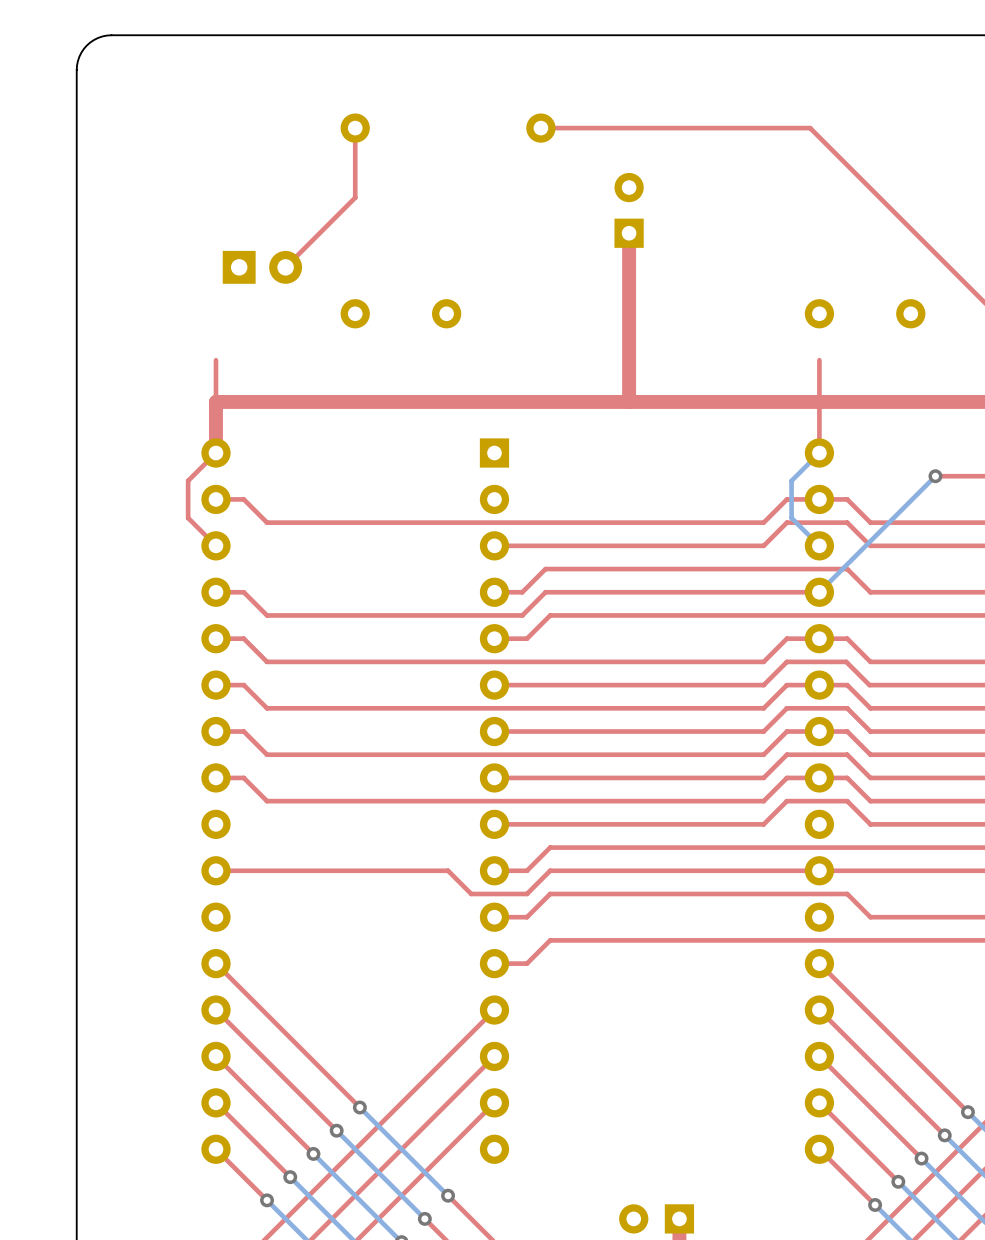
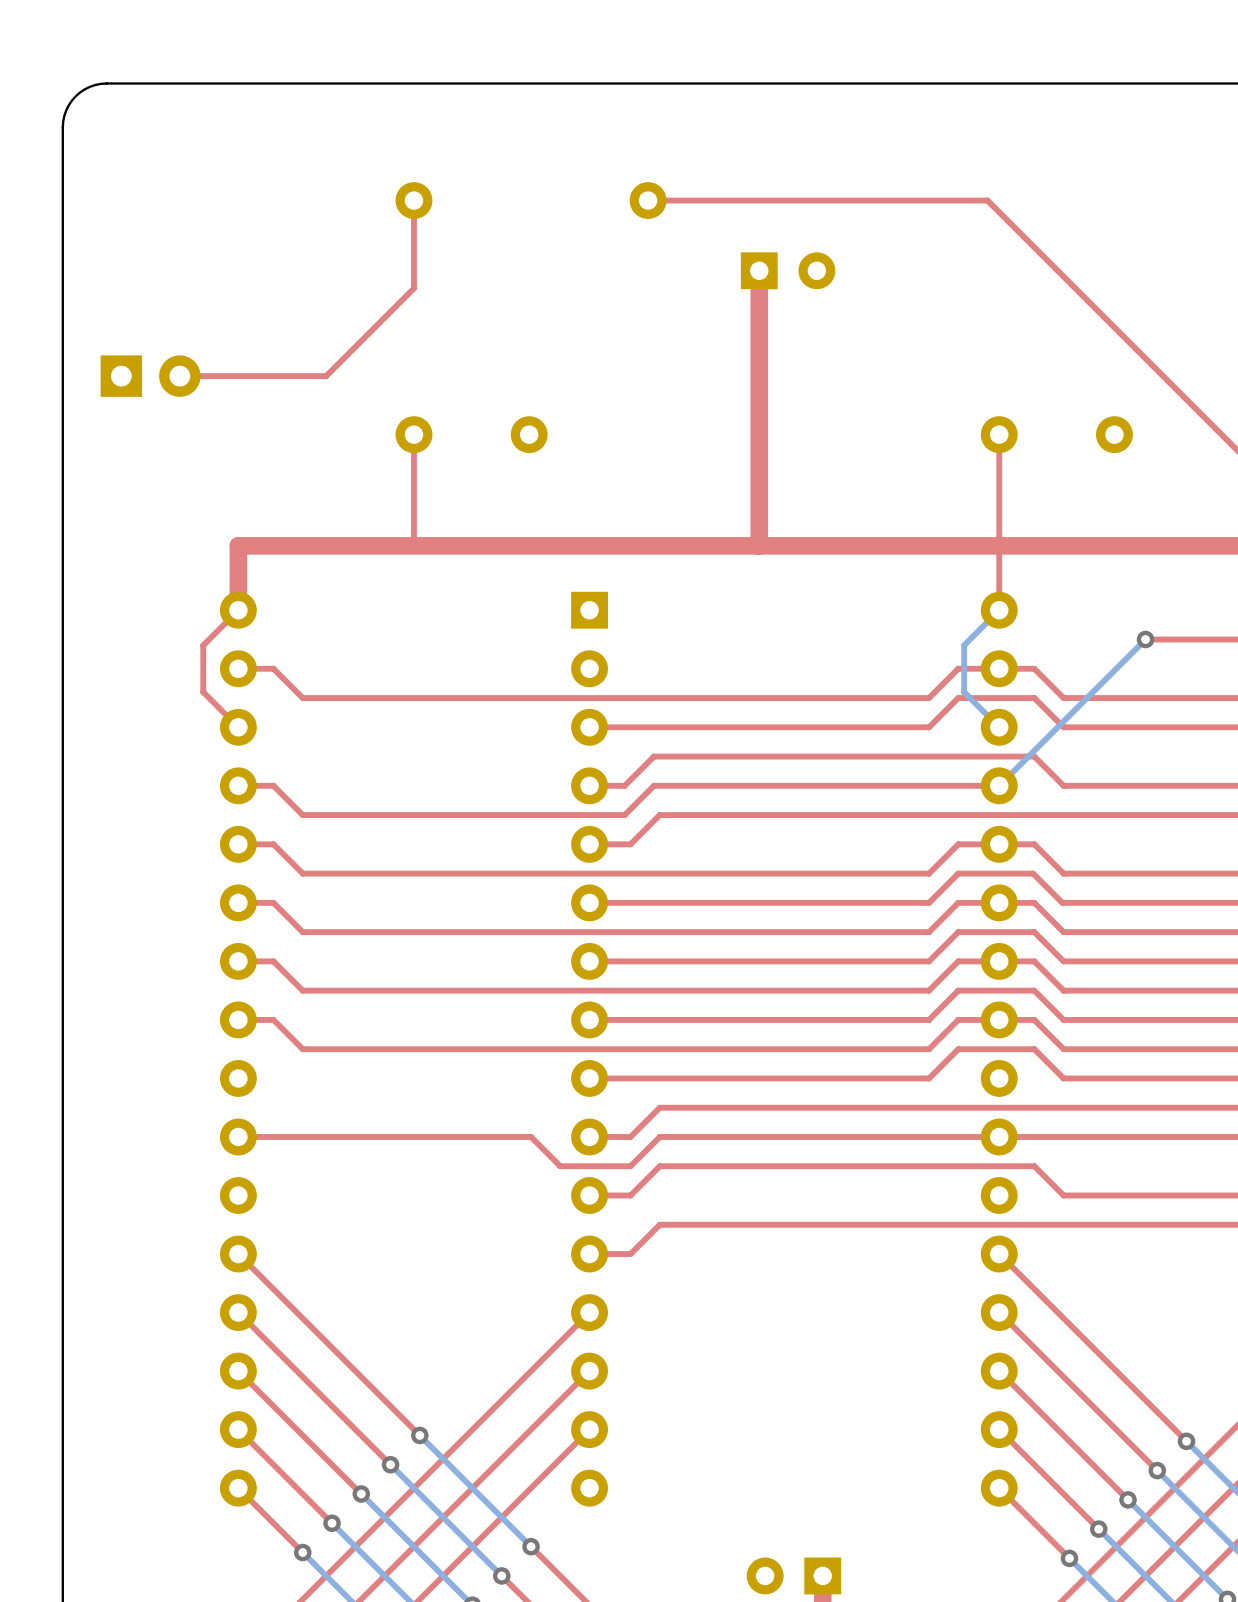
top track: none -> (759, 270) (759, 333)
part rotation: 0° (629, 210) -> 90° clockwise (788, 270)
part position: (262, 267) -> (150, 376)
top track: none -> (326, 376) (179, 376)
top track: none -> (413, 434) (413, 545)
top track: none -> (999, 434) (999, 493)
top track: (215, 360) (215, 401) -> none

